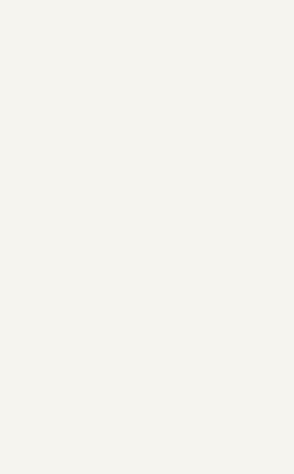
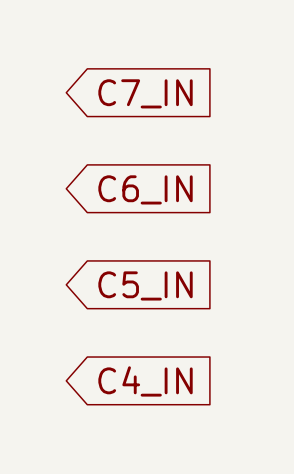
global label: none -> C7_IN (145, 93)
global label: none -> C6_IN (145, 189)
global label: none -> C5_IN (145, 285)
global label: none -> C4_IN (145, 381)

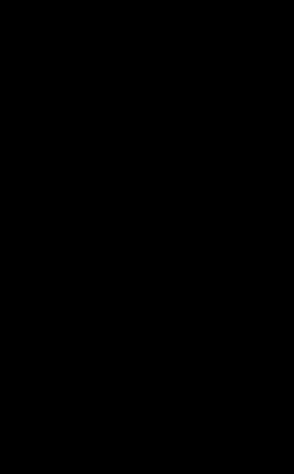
global label: C7_IN (145, 93) -> none
global label: C6_IN (145, 189) -> none
global label: C5_IN (145, 285) -> none
global label: C4_IN (145, 381) -> none

